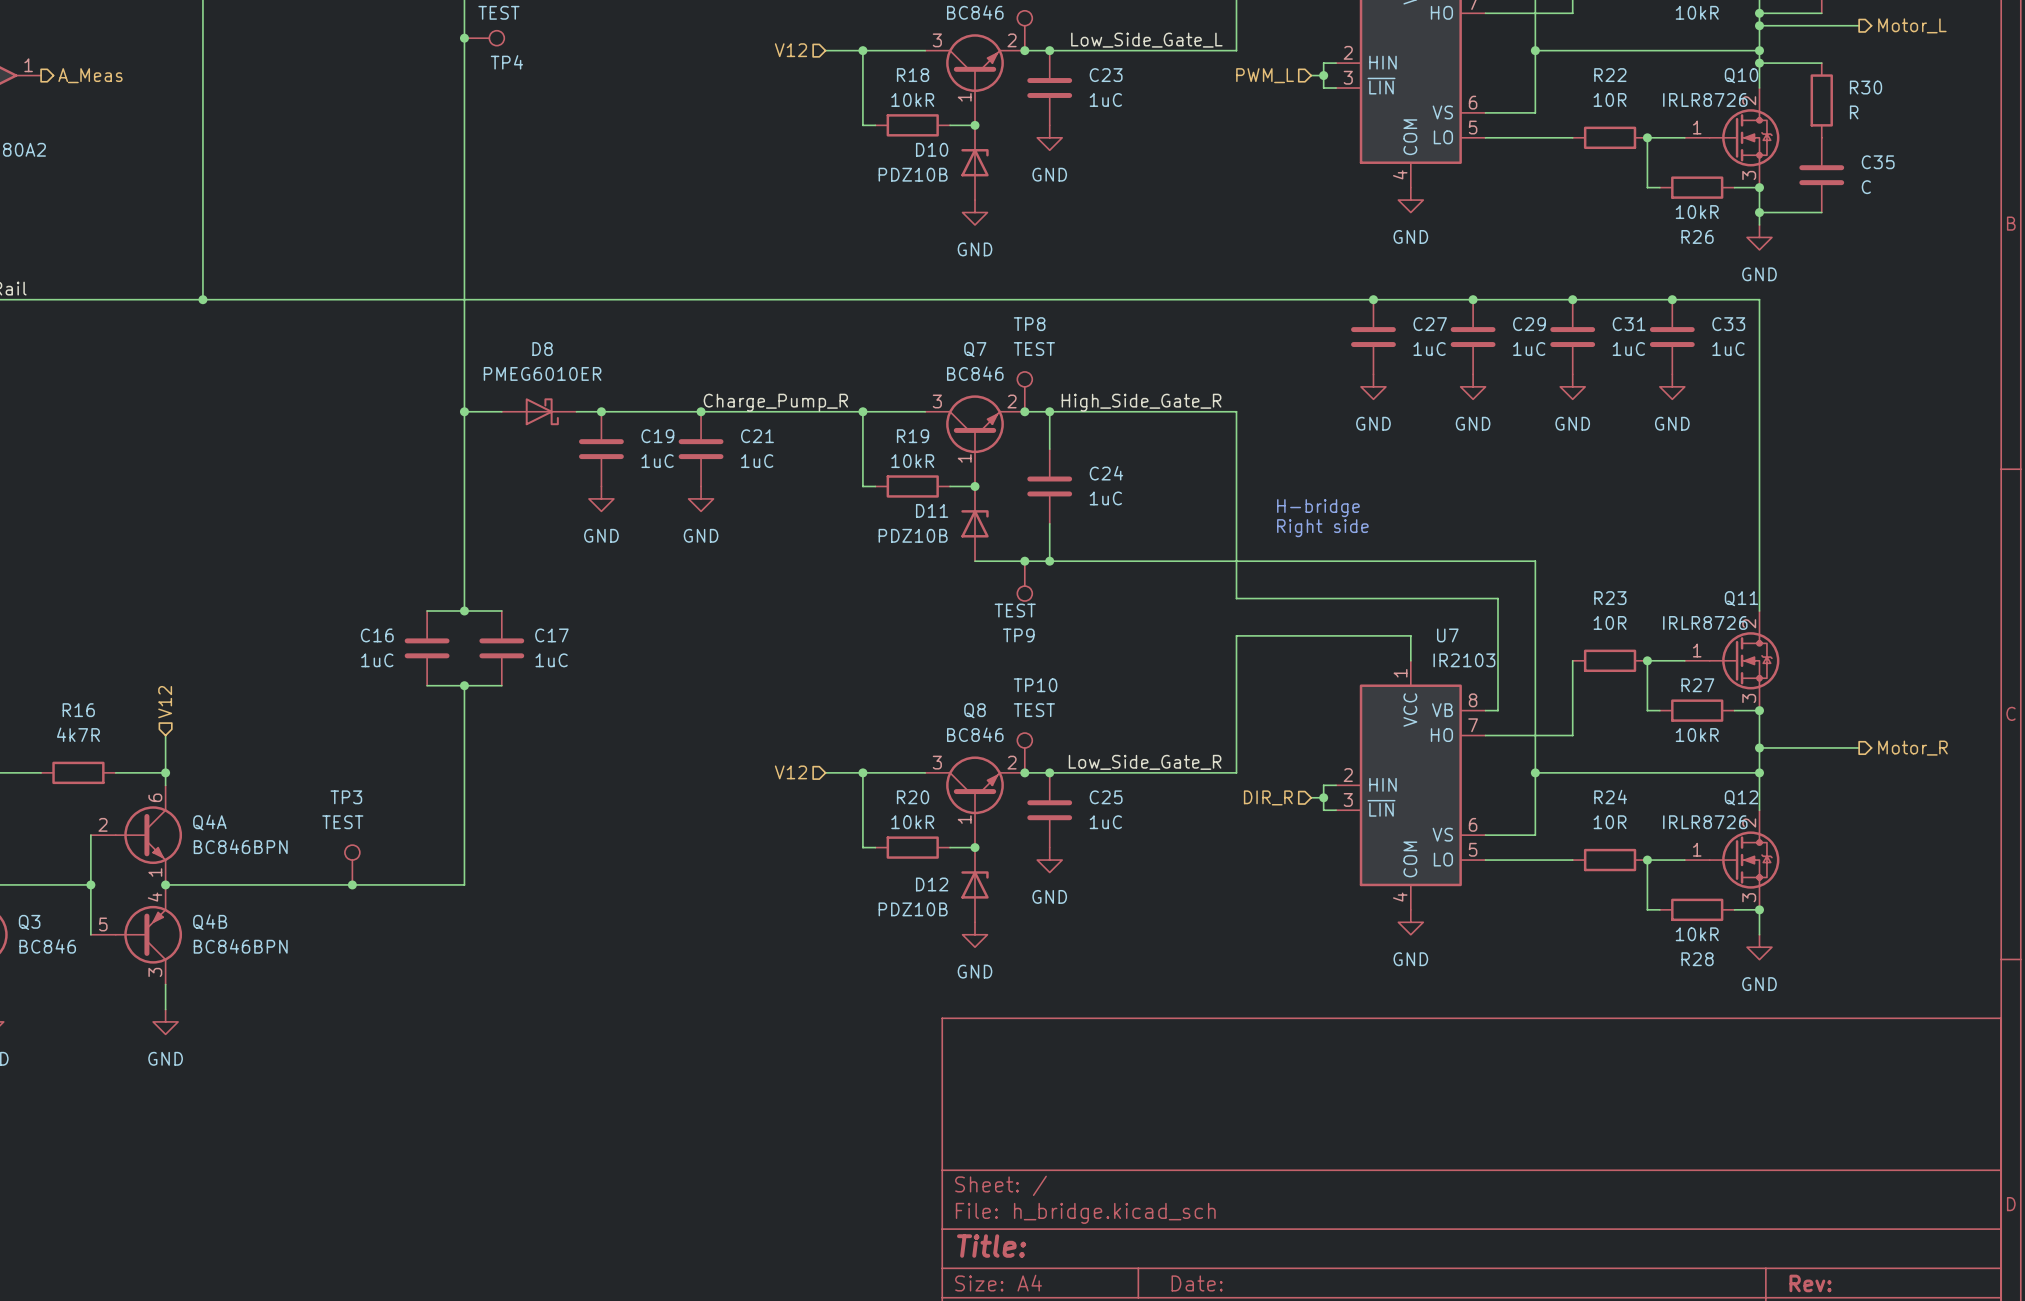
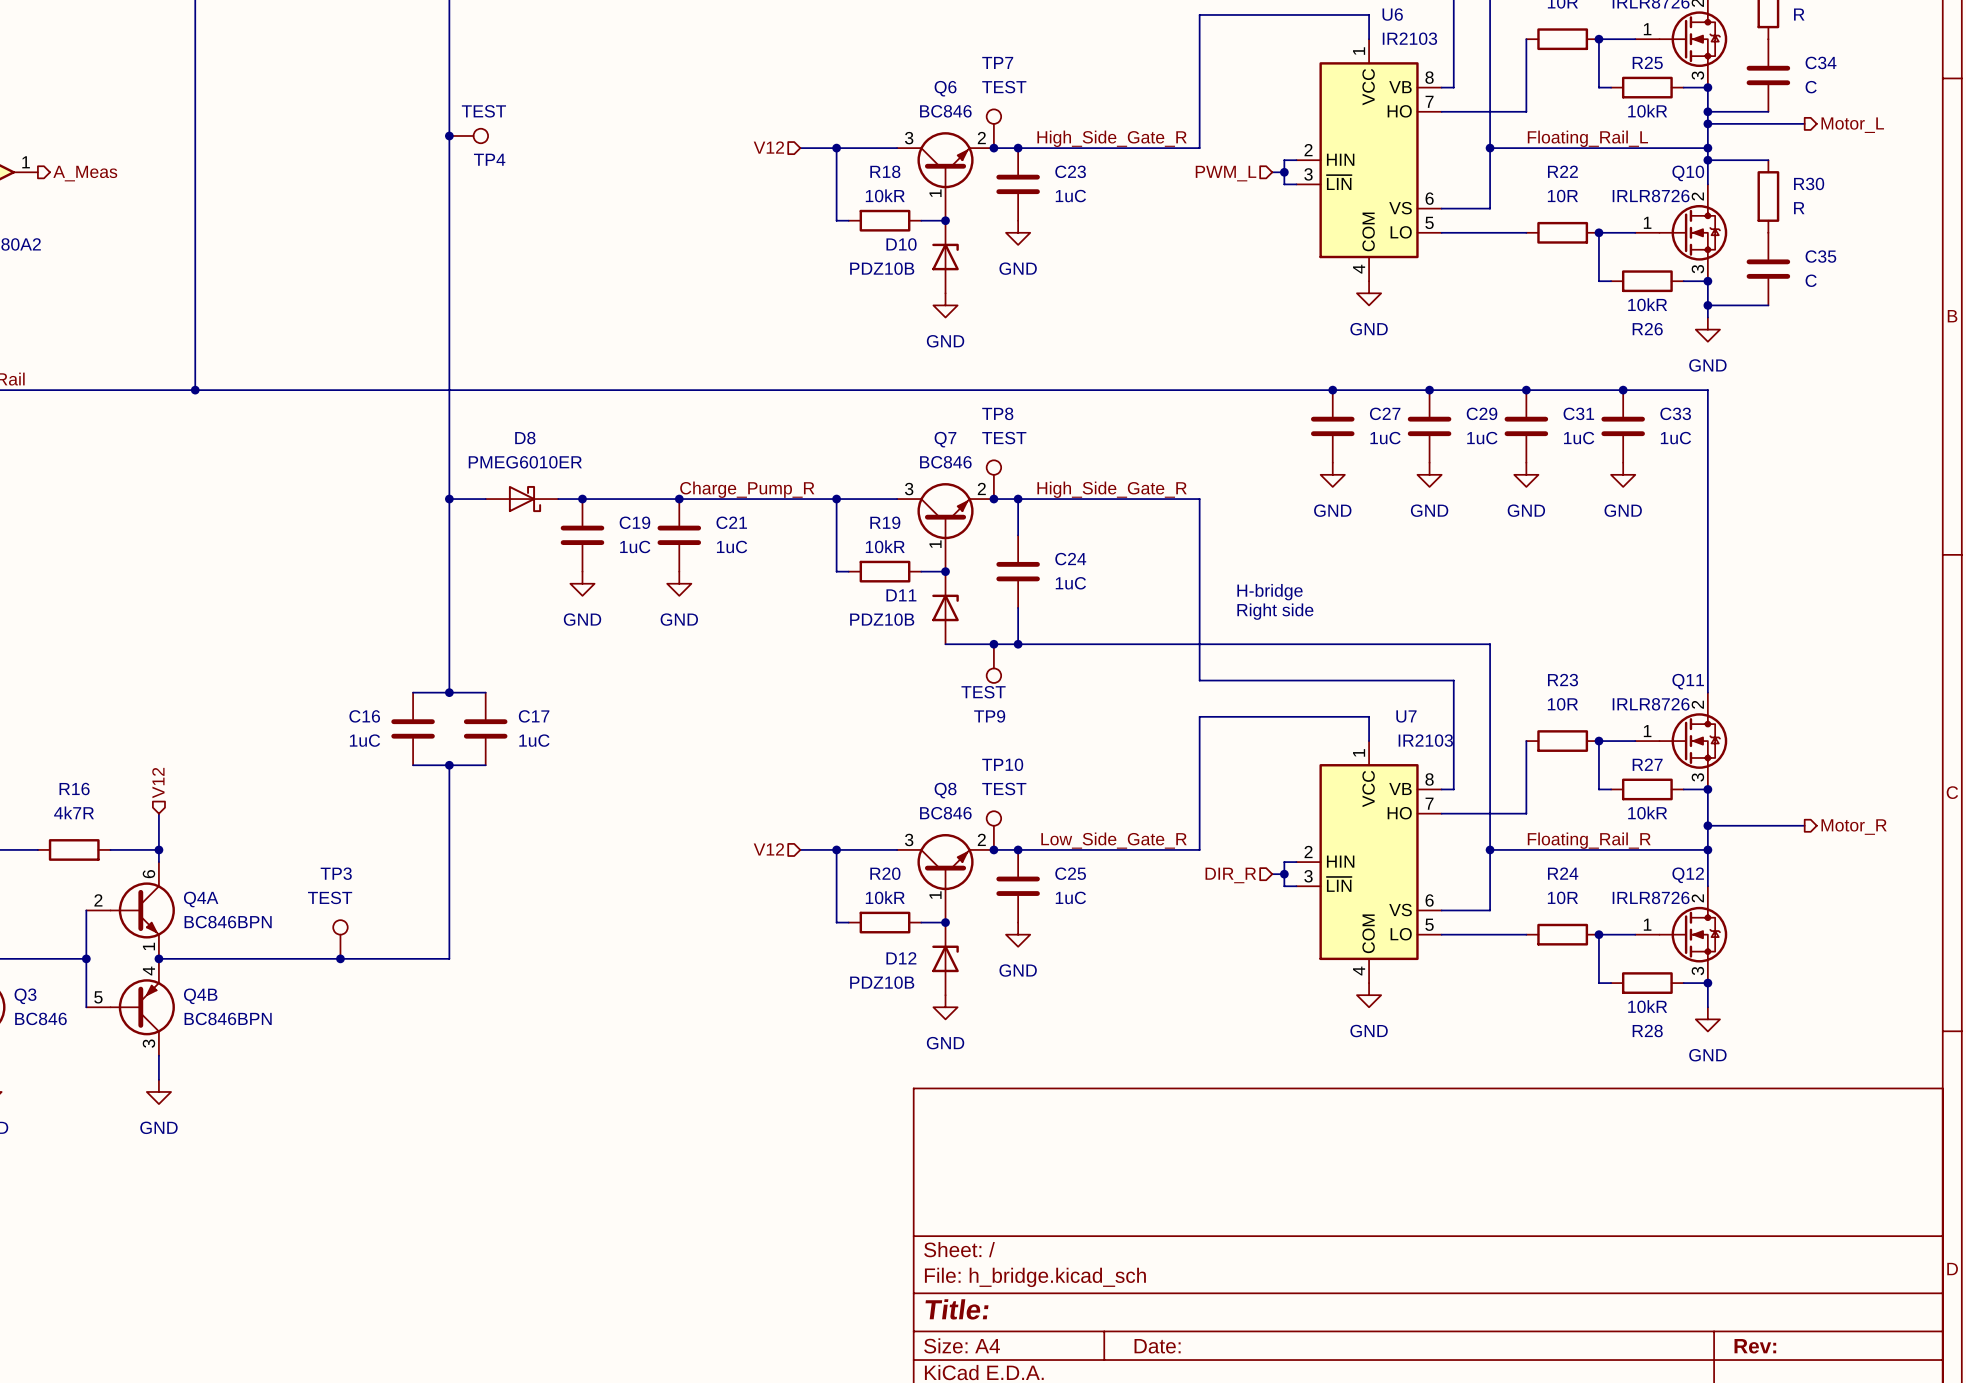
label: Low_Side_Gate_L (1146, 40) -> High_Side_Gate_R (1112, 138)
label: none -> Floating_Rail_L (1587, 138)
label: none -> Floating_Rail_R (1589, 840)

